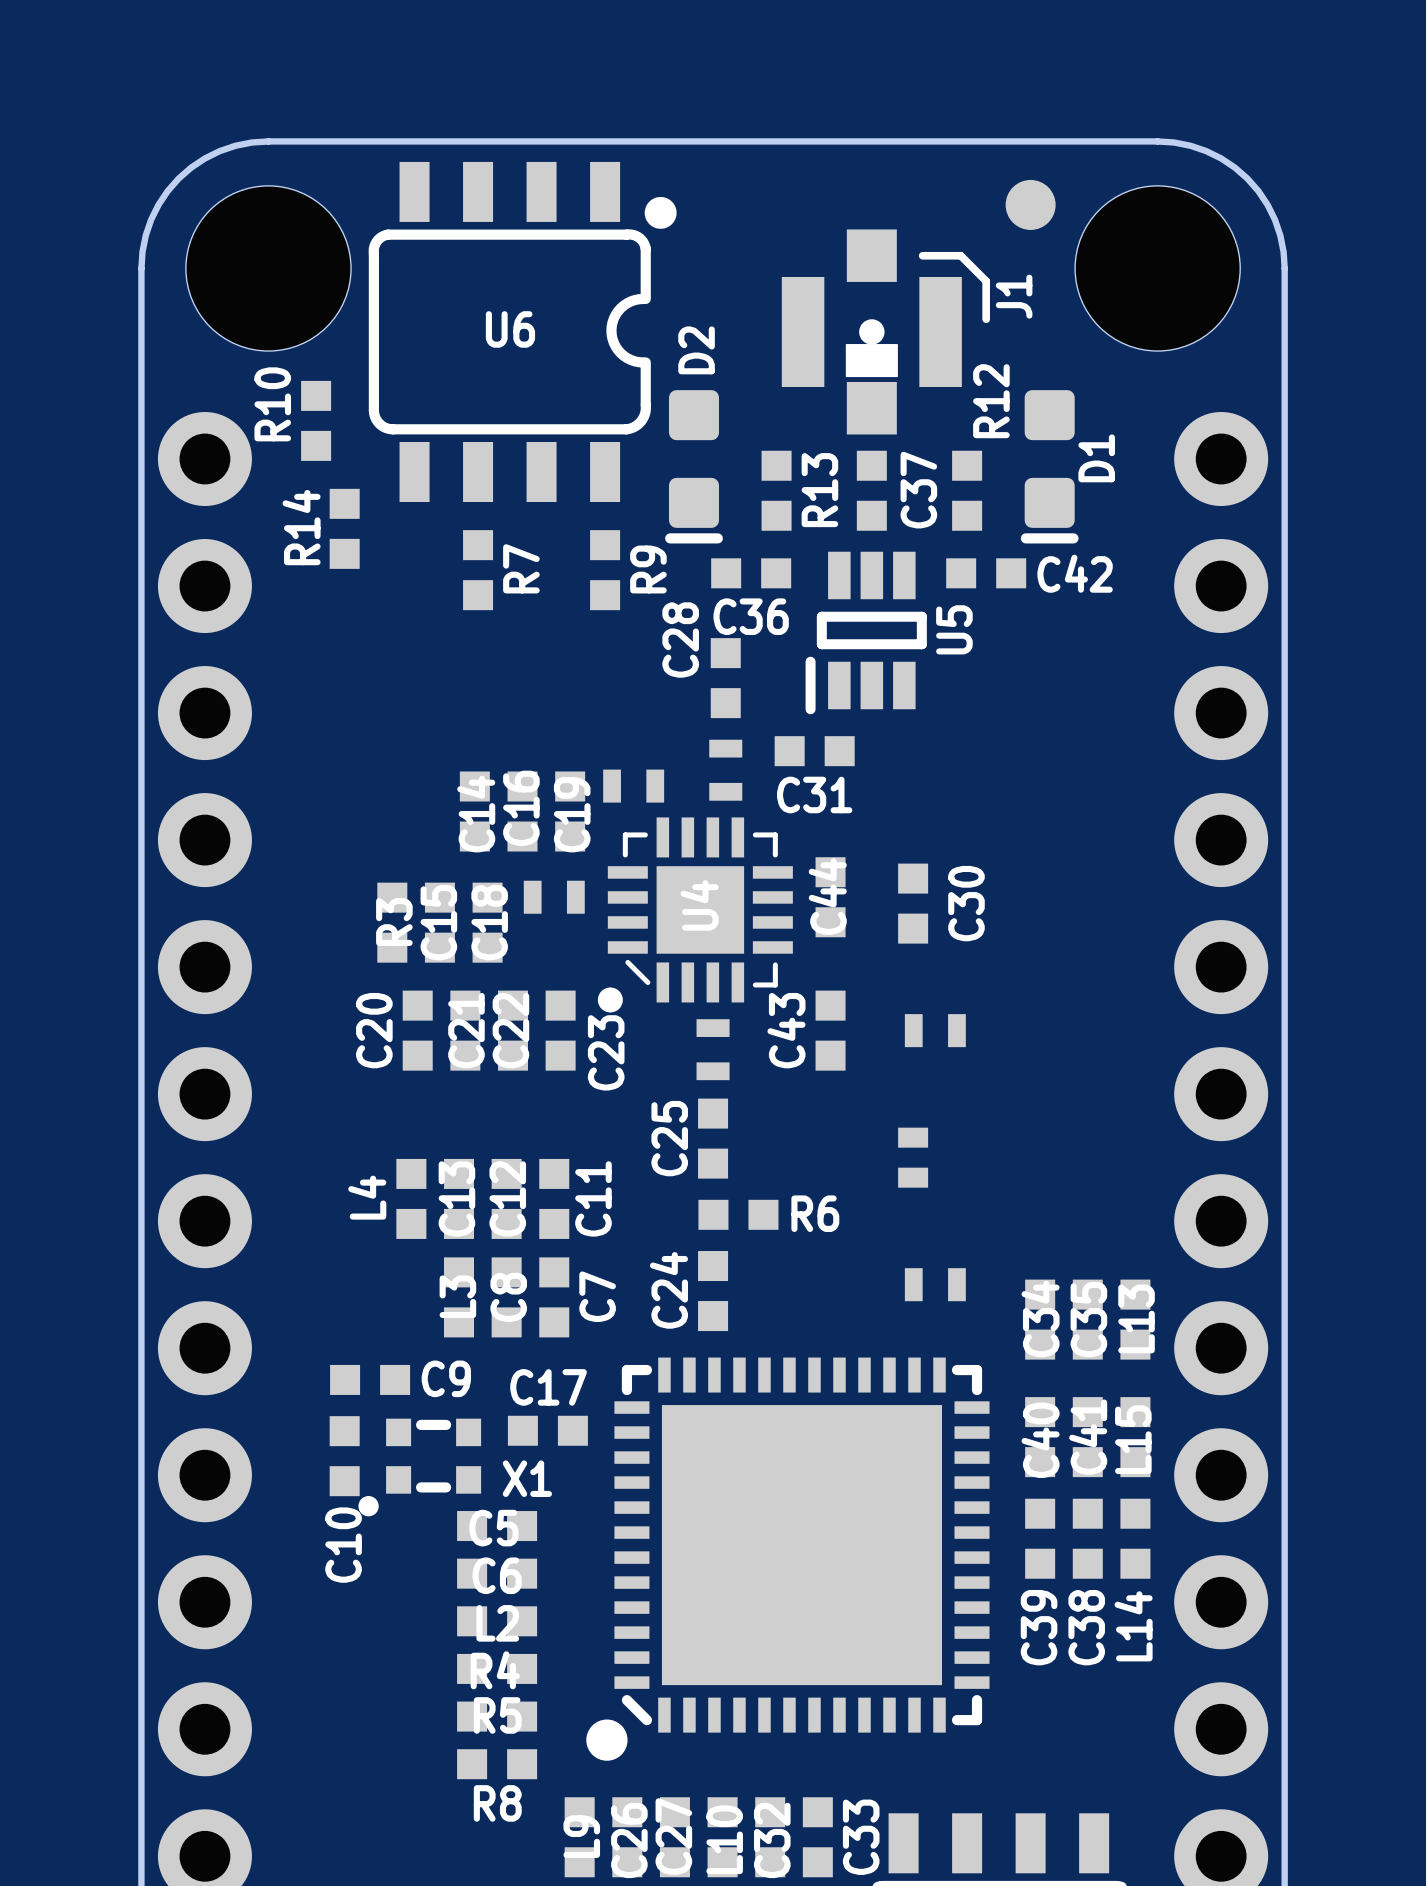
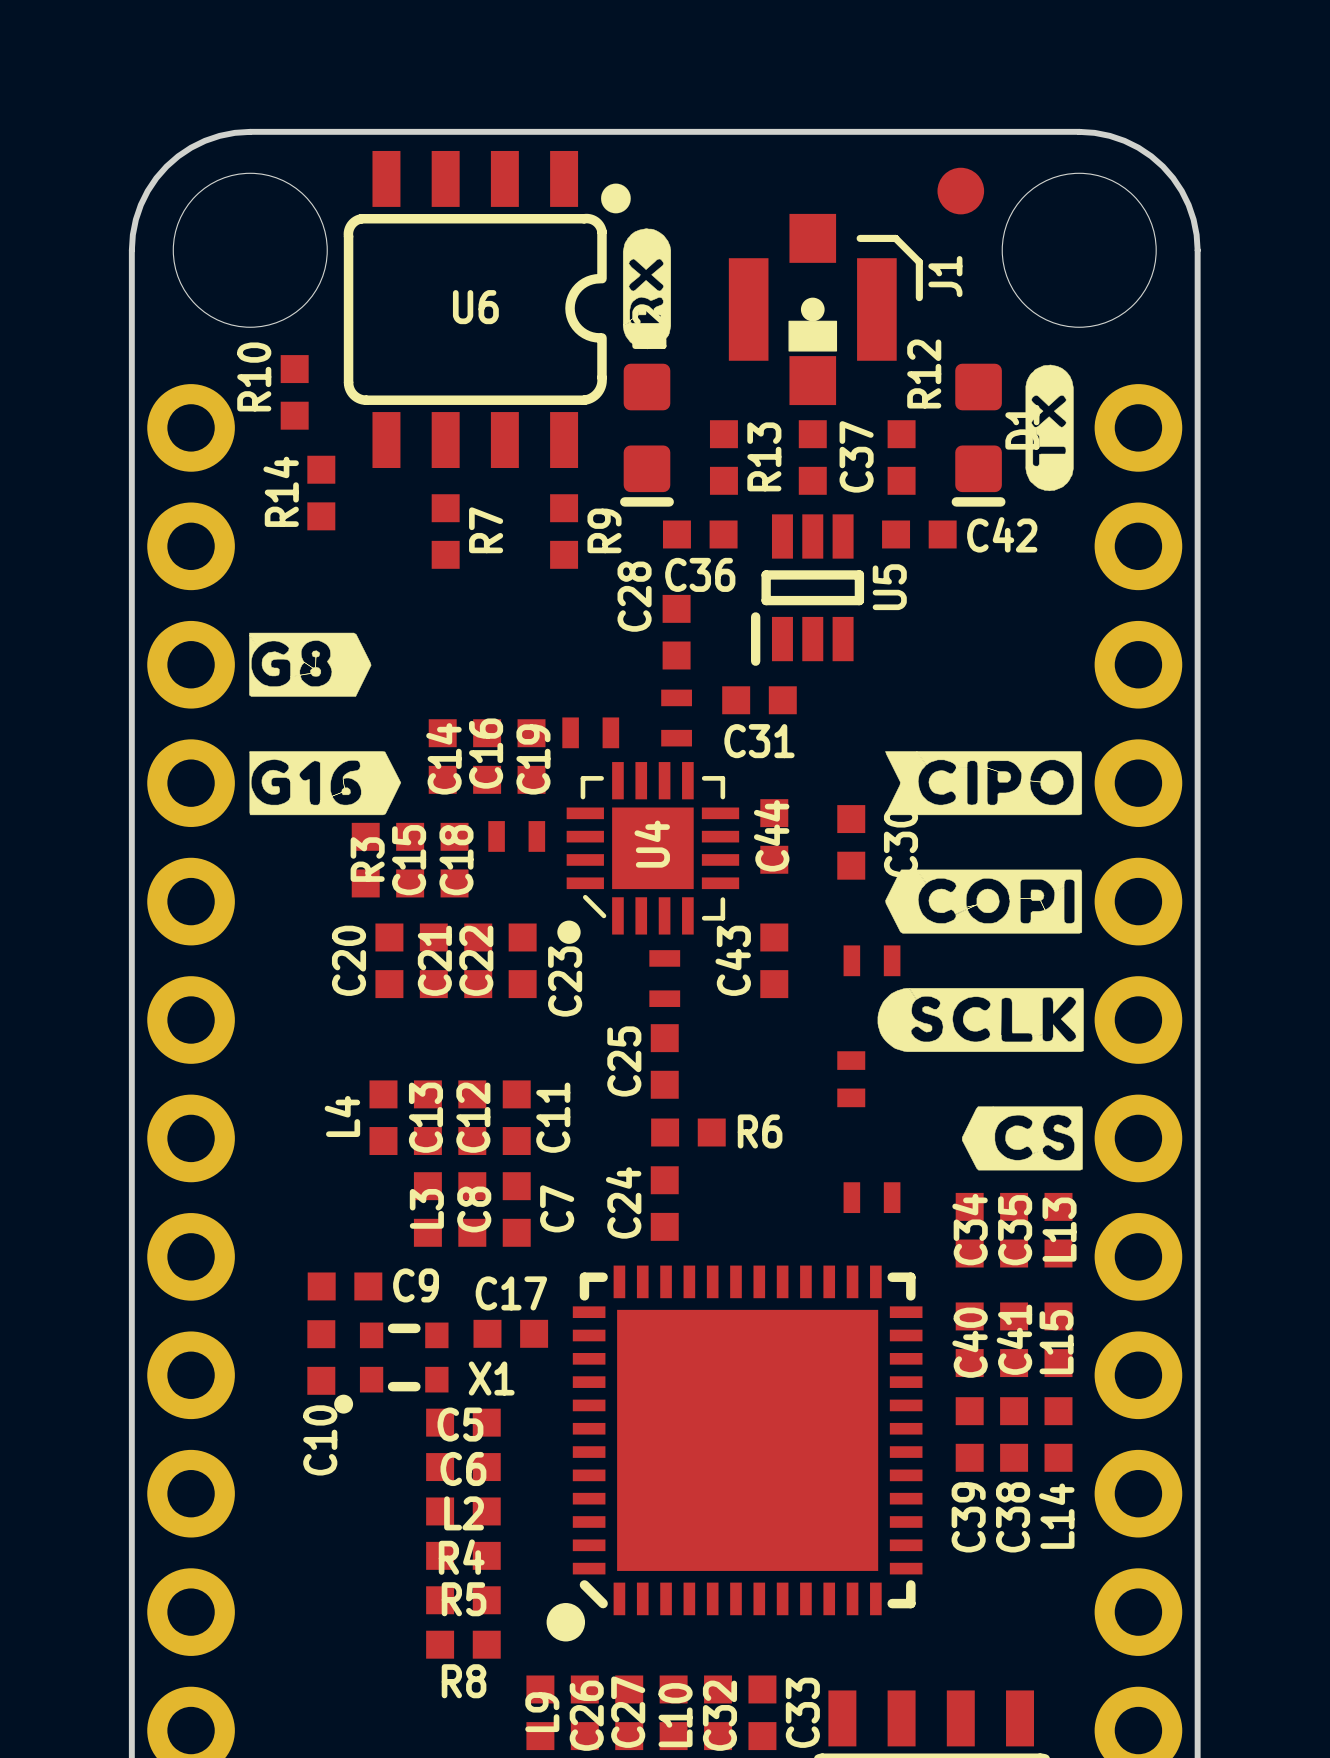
drawing: none -> [622, 228, 671, 350]
drawing: none -> [1025, 364, 1074, 492]
drawing: none -> [249, 632, 402, 816]
drawing: none -> [877, 751, 1084, 1171]

